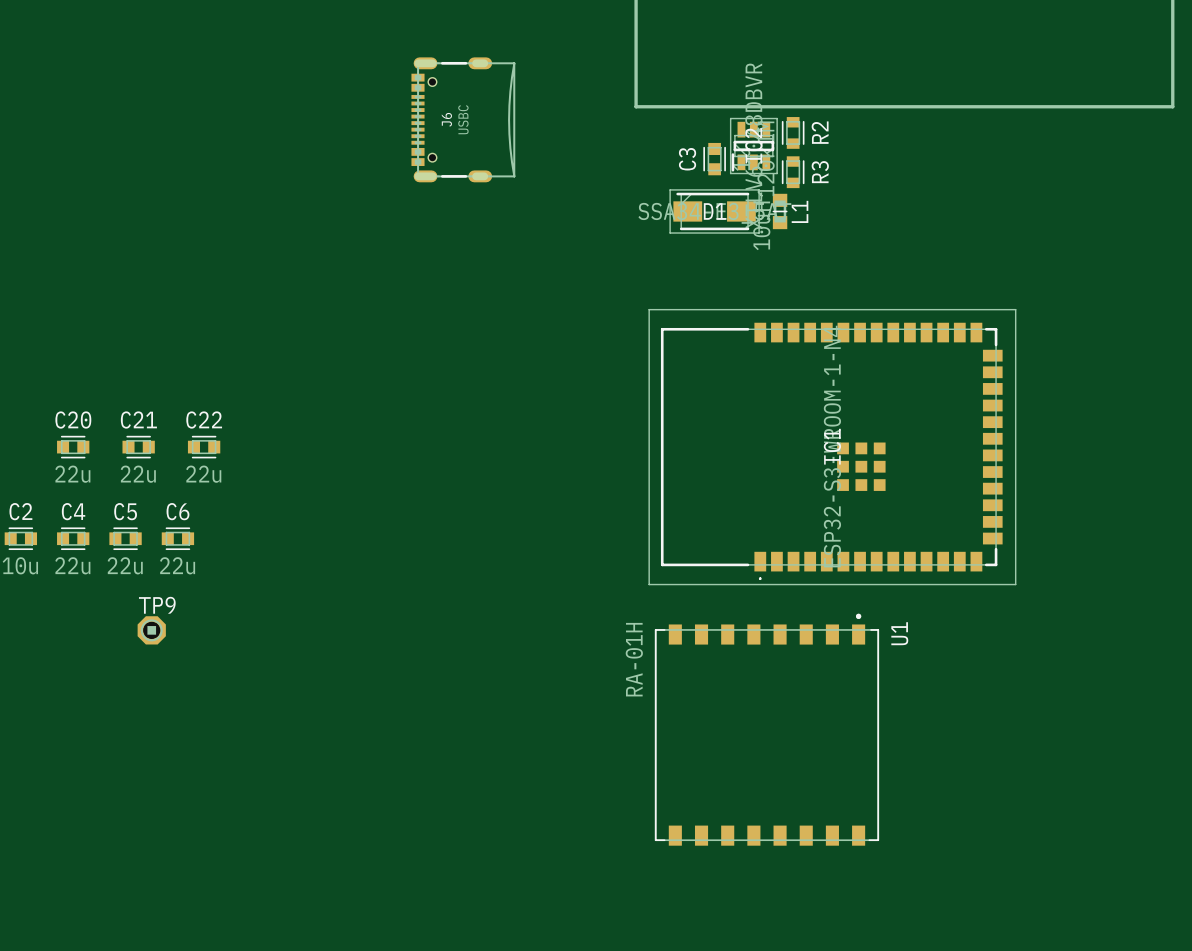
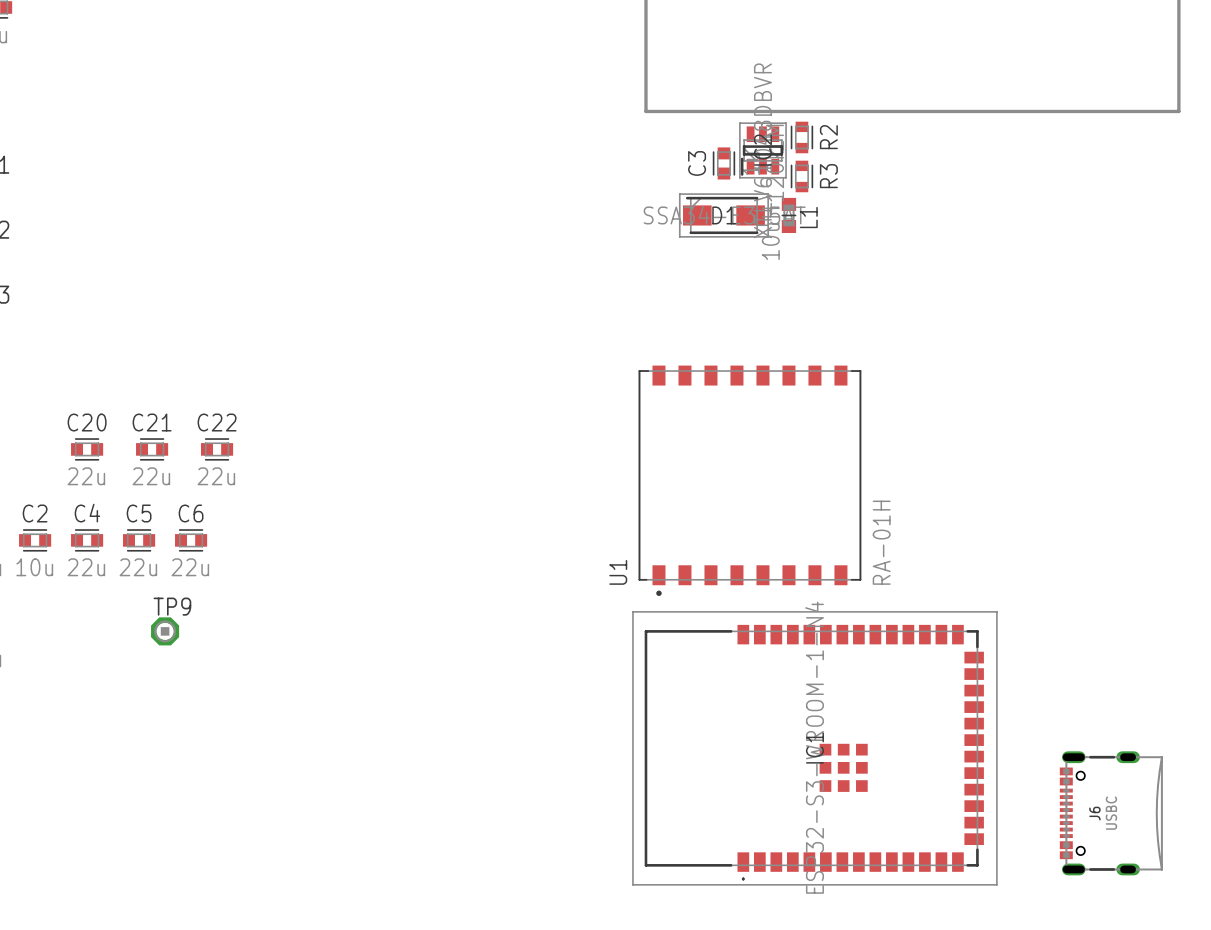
J6 position: (463, 119) -> (1111, 813)
IC1 position: (832, 447) -> (814, 748)
U1 rotation: 0° (766, 729) -> 180° (749, 480)
U1 position: (766, 729) -> (749, 480)

